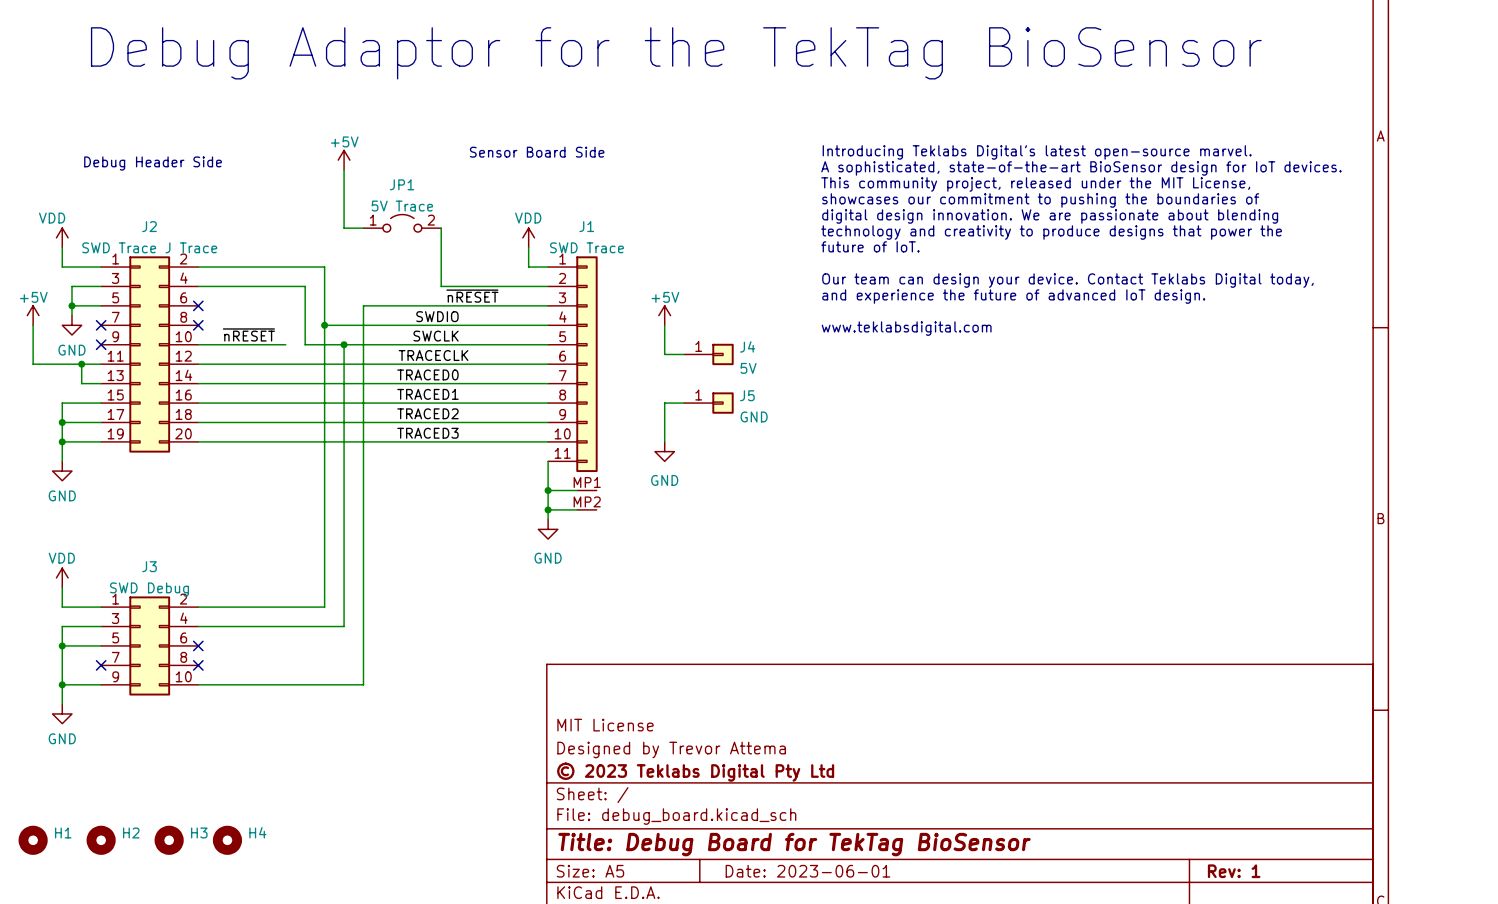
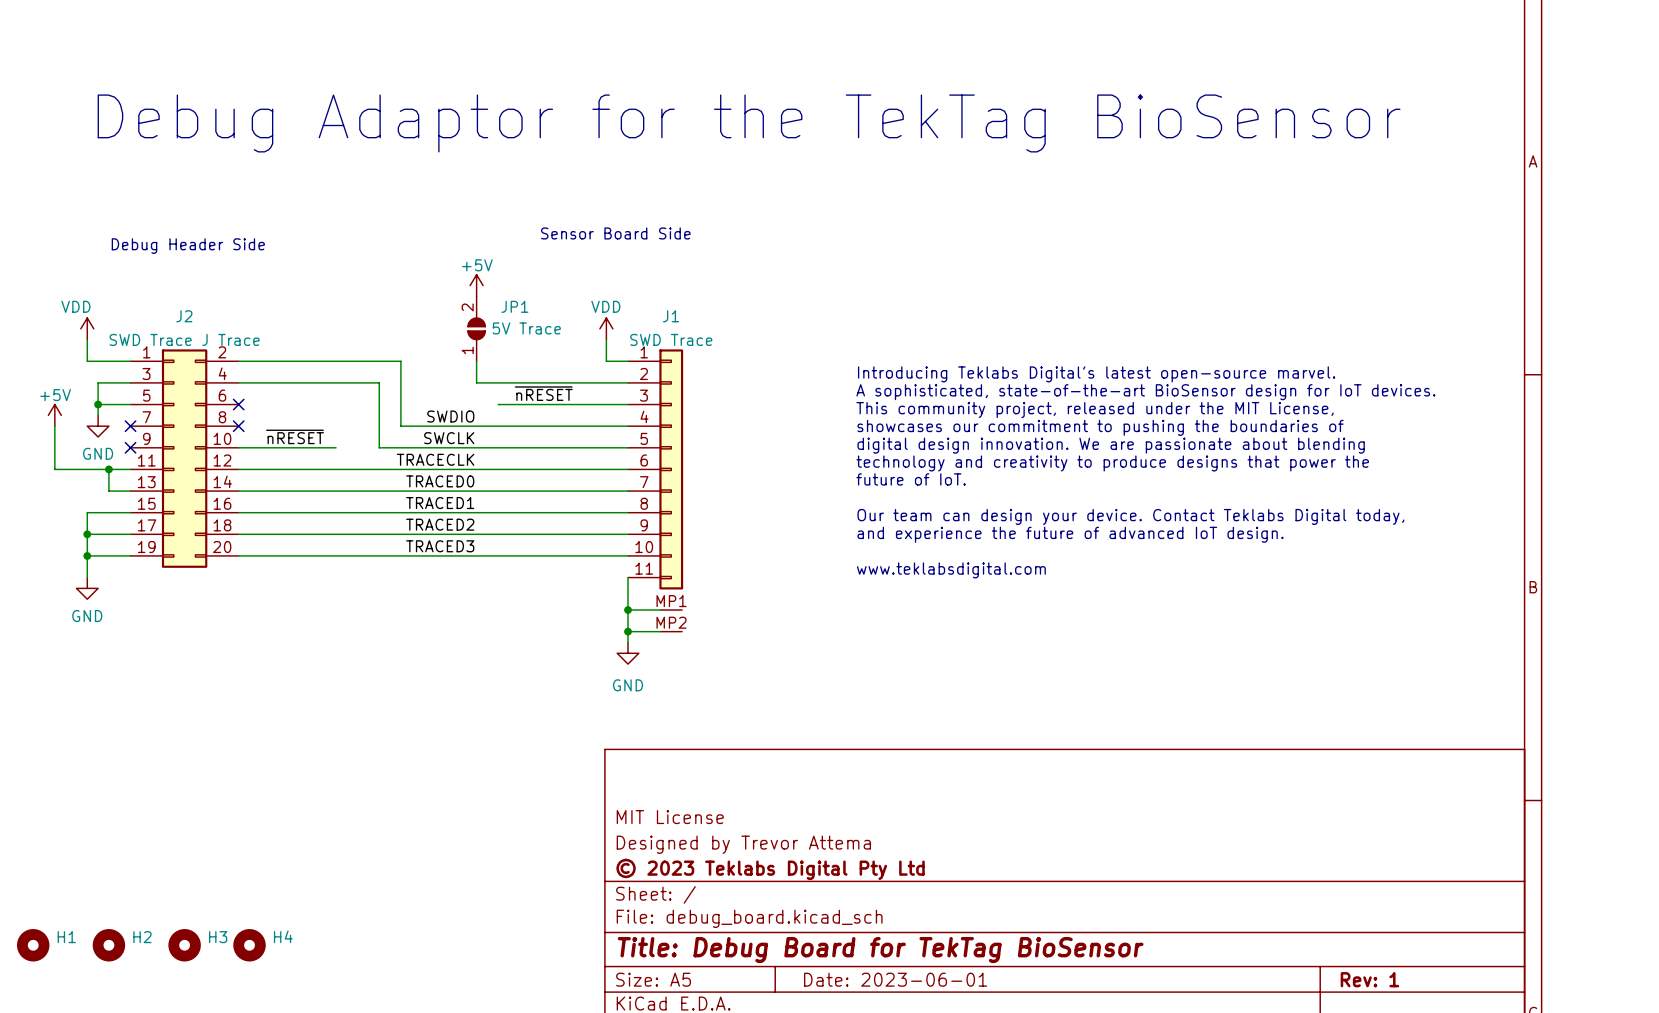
text position: Debug Adaptor for the TekTag BioSensor (676, 53) -> Debug Adaptor for the TekTag BioSensor (749, 123)
text position: Sensor Board Side (537, 152) -> Sensor Board Side (615, 233)
text position: Introducing Teklabs Digital's latest open-source marvel. (1037, 152) -> Introducing Teklabs Digital's latest open-source marvel. (1096, 374)
power symbol: +5V (344, 160) -> none
text position: Debug Header Side (153, 163) -> Debug Header Side (188, 246)
text position: A sophisticated, state-of-the-art BioSensor design for IoT devices. (1081, 168) -> A sophisticated, state-of-the-art BioSensor design for IoT devices. (1145, 392)
wire: (344, 169) (344, 228) (363, 228) -> none
JP1 name position: JP1 (402, 184) -> JP1 (514, 306)
text position: This community project, released under the MIT License, (1035, 184) -> This community project, released under the MIT License, (1095, 410)
text position: showcases our commitment to pushing the boundaries of (1040, 200) -> showcases our commitment to pushing the boundaries of (1100, 427)
JP1 value position: 5V Trace (402, 206) -> 5V Trace (526, 328)
JP1 symbol: [363, 214, 442, 233] -> [467, 296, 486, 362]
text position: digital design innovation. We are passionate about blending (1050, 216) -> digital design innovation. We are passionate about blending (1111, 445)
wire: (441, 228) (441, 286) (548, 286) -> none
text position: technology and creativity to produce designs that power the (1051, 232) -> technology and creativity to produce designs that power the (1112, 463)
power symbol position: VDD (62, 237) -> VDD (87, 328)
power symbol position: VDD (528, 237) -> VDD (606, 328)
text position: future of IoT. (870, 246) -> future of IoT. (911, 479)
wire: (62, 247) (62, 267) (101, 267) -> (87, 339) (87, 361) (130, 361)
power symbol: none -> +5V (476, 285)
wire: (528, 247) (528, 267) (548, 267) -> (606, 339) (606, 361) (628, 361)
wire: (198, 267) (324, 267) (324, 607) (198, 607) -> none
text position: Our team can design your device. Contact Teklabs Digital today, (1067, 280) -> Our team can design your device. Contact Teklabs Digital today, (1130, 516)
wire: (101, 286) (71, 286) (71, 315) -> (130, 382) (98, 382) (98, 415)
wire: (198, 286) (305, 286) (305, 344) (548, 344) -> none
label position: ~{nRESET} (472, 296) -> ~{nRESET} (543, 393)
text position: and experience the future of advanced IoT design. (1013, 296) -> and experience the future of advanced IoT design. (1070, 534)
wire: (71, 305) (101, 305) -> (98, 404) (130, 404)
junction: (71, 305) -> none
no-connect mark: (198, 305) -> none
wire: (548, 305) (363, 305) (363, 315) -> (238, 361) (400, 361)
power symbol position: +5V (33, 315) -> +5V (54, 415)
wire: none -> (476, 361) (476, 382) (628, 382)
power symbol: +5V (664, 315) -> none
label position: SWDIO (437, 316) -> SWDIO (450, 416)
wire: (33, 325) (33, 364) (101, 364) -> (54, 426) (54, 469) (130, 469)
power symbol: GND (71, 325) -> none
no-connect mark: (101, 325) -> none
no-connect mark: (198, 325) -> none
wire: (324, 325) (548, 325) -> none
junction: (324, 325) -> none
wire: (664, 325) (664, 354) (684, 354) -> none
text position: www.teklabsdigital.com (906, 328) -> www.teklabsdigital.com (951, 570)
label position: ~{nRESET} (248, 334) -> ~{nRESET} (295, 436)
wire: none -> (238, 382) (379, 382) (379, 393)
label position: SWCLK (436, 336) -> SWCLK (449, 438)
no-connect mark: (101, 344) -> none
wire: (198, 344) (285, 344) -> (238, 447) (336, 447)
junction: (344, 344) -> none
J2 position: (149, 354) -> (184, 458)
no-connect mark: none -> (238, 404)
wire: none -> (498, 404) (628, 404)
J4: 5V (708, 354) -> none
label position: TRACECLK (433, 355) -> TRACECLK (435, 459)
wire: (81, 364) (81, 383) (101, 383) -> (108, 469) (108, 491) (130, 491)
junction position: (81, 364) -> (98, 404)
wire: (198, 364) (548, 364) -> (238, 469) (628, 469)
power symbol: none -> GND (98, 426)
no-connect mark: none -> (130, 426)
no-connect mark: none -> (238, 426)
wire: (363, 373) (363, 684) (198, 684) -> (400, 426) (628, 426)
label position: TRACED0 (427, 374) -> TRACED0 (440, 481)
wire: (198, 383) (548, 383) -> (238, 491) (628, 491)
J1 position: (572, 383) -> (655, 490)
no-connect mark: none -> (130, 447)
wire: (344, 393) (344, 626) (198, 626) -> (379, 447) (628, 447)
label position: TRACED1 (427, 394) -> TRACED1 (440, 503)
wire: (101, 403) (62, 403) (62, 461) -> (130, 512) (87, 512) (87, 577)
wire: (198, 403) (548, 403) -> (238, 512) (628, 512)
wire: (684, 403) (664, 403) (664, 441) -> none
J5: GND (708, 403) -> none
junction: none -> (108, 469)
label position: TRACED2 (427, 413) -> TRACED2 (440, 524)
wire: (62, 422) (101, 422) -> (87, 534) (130, 534)
junction: (62, 422) -> none
wire: (198, 422) (548, 422) -> (238, 534) (628, 534)
label position: TRACED3 (427, 433) -> TRACED3 (440, 546)
wire: (62, 441) (101, 441) -> (87, 555) (130, 555)
junction: (62, 441) -> none
wire: (198, 441) (548, 441) -> none
power symbol: GND (664, 451) -> none
wire: (548, 461) (548, 519) -> (628, 577) (628, 642)
power symbol: GND (62, 471) -> none
junction: none -> (87, 534)
junction: none -> (87, 555)
wire: none -> (238, 555) (606, 555)
junction: (548, 490) -> none
wire: (548, 509) (577, 509) -> (628, 631) (660, 631)
junction: (548, 509) -> none
power symbol: none -> GND (87, 588)
power symbol position: GND (548, 529) -> GND (628, 653)
wire: none -> (628, 610) (660, 610)
junction: none -> (628, 610)
junction: none -> (628, 631)
power symbol: VDD (62, 577) -> none
wire: (62, 587) (62, 607) (101, 607) -> none
wire: (101, 626) (62, 626) (62, 704) -> none
wire: (62, 645) (101, 645) -> none
junction: (62, 645) -> none
J3: SWD Debug (149, 645) -> none
no-connect mark: (198, 645) -> none
no-connect mark: (101, 665) -> none
no-connect mark: (198, 665) -> none
wire: (62, 684) (101, 684) -> none
junction: (62, 684) -> none
power symbol: GND (62, 713) -> none

